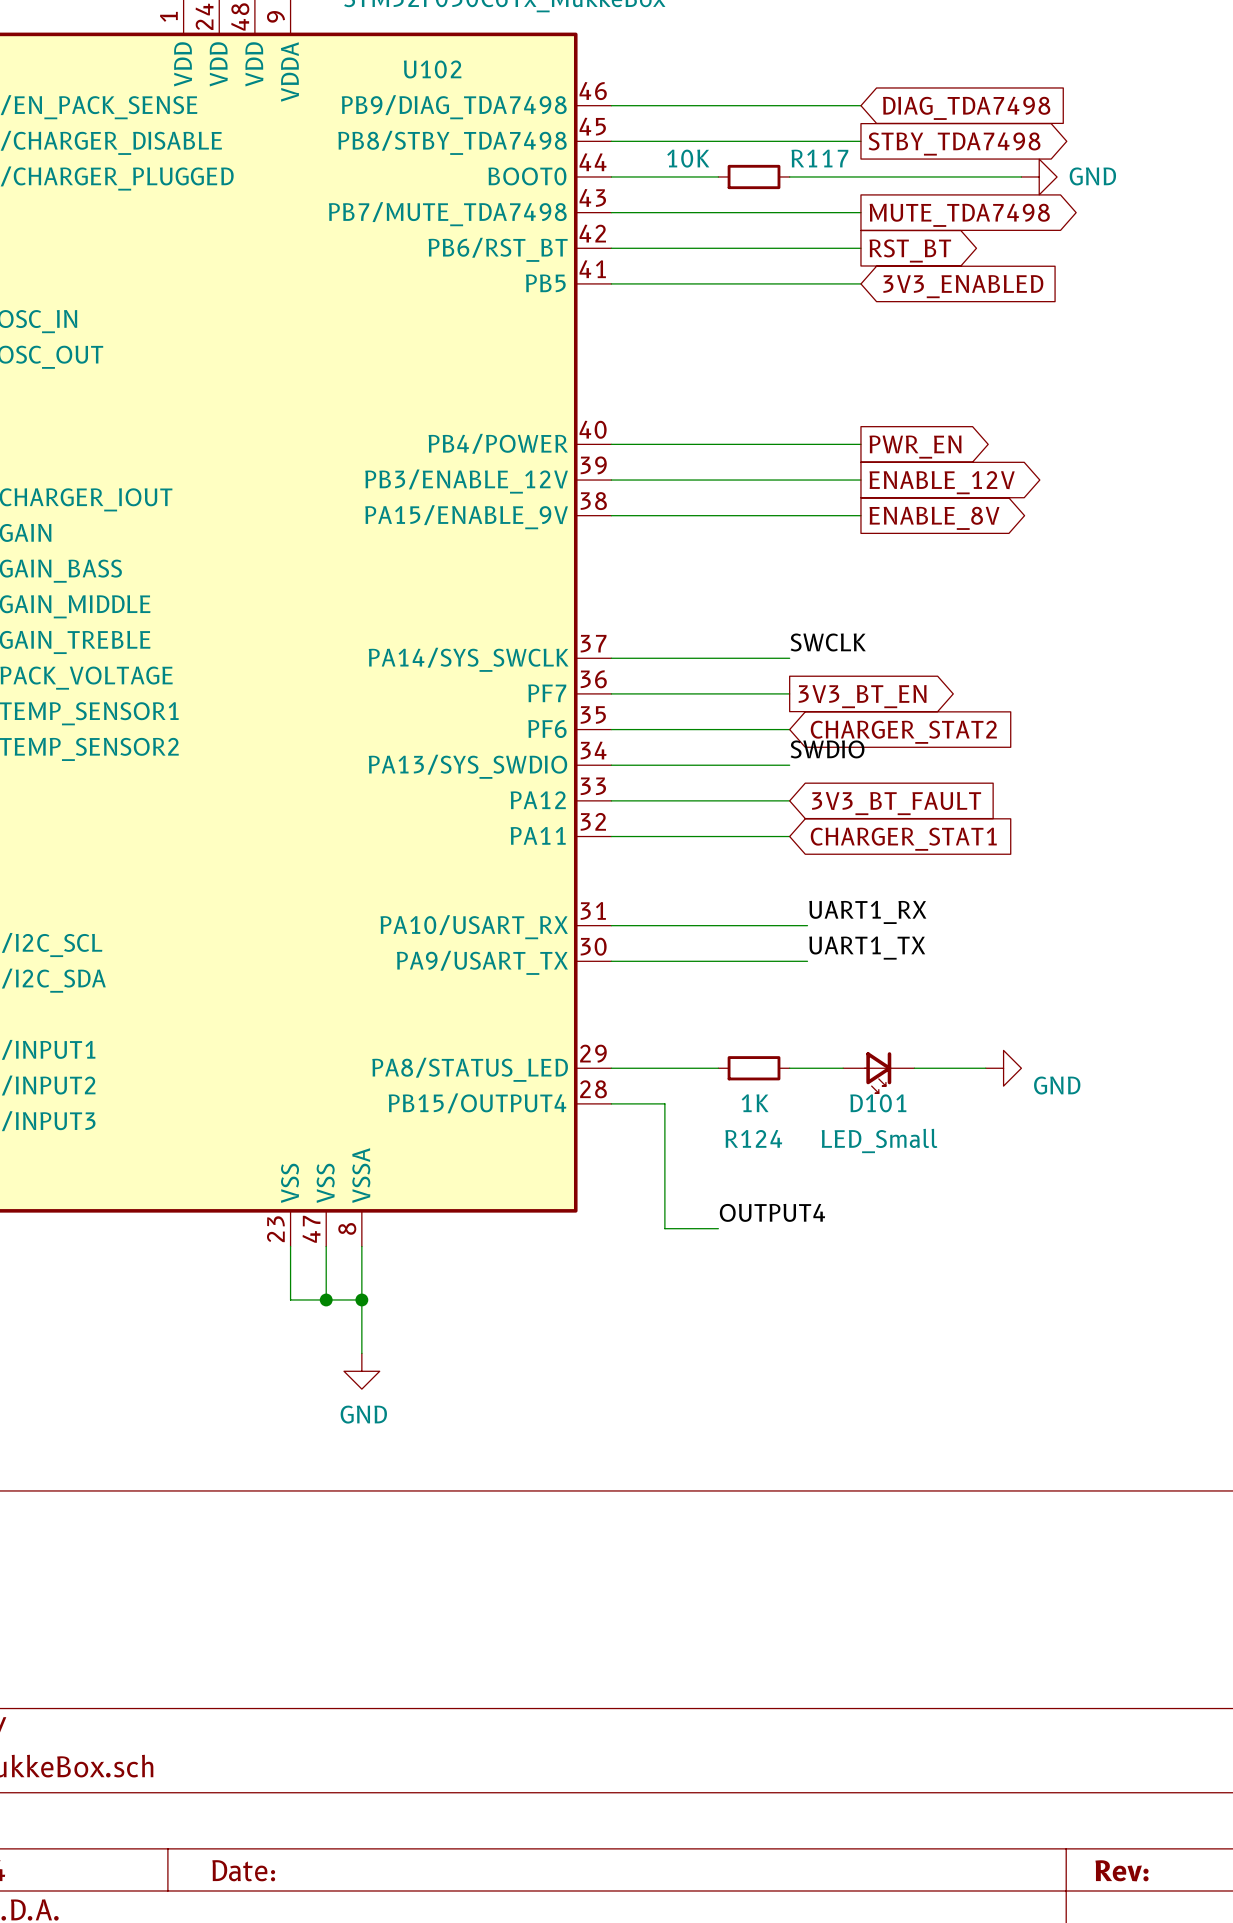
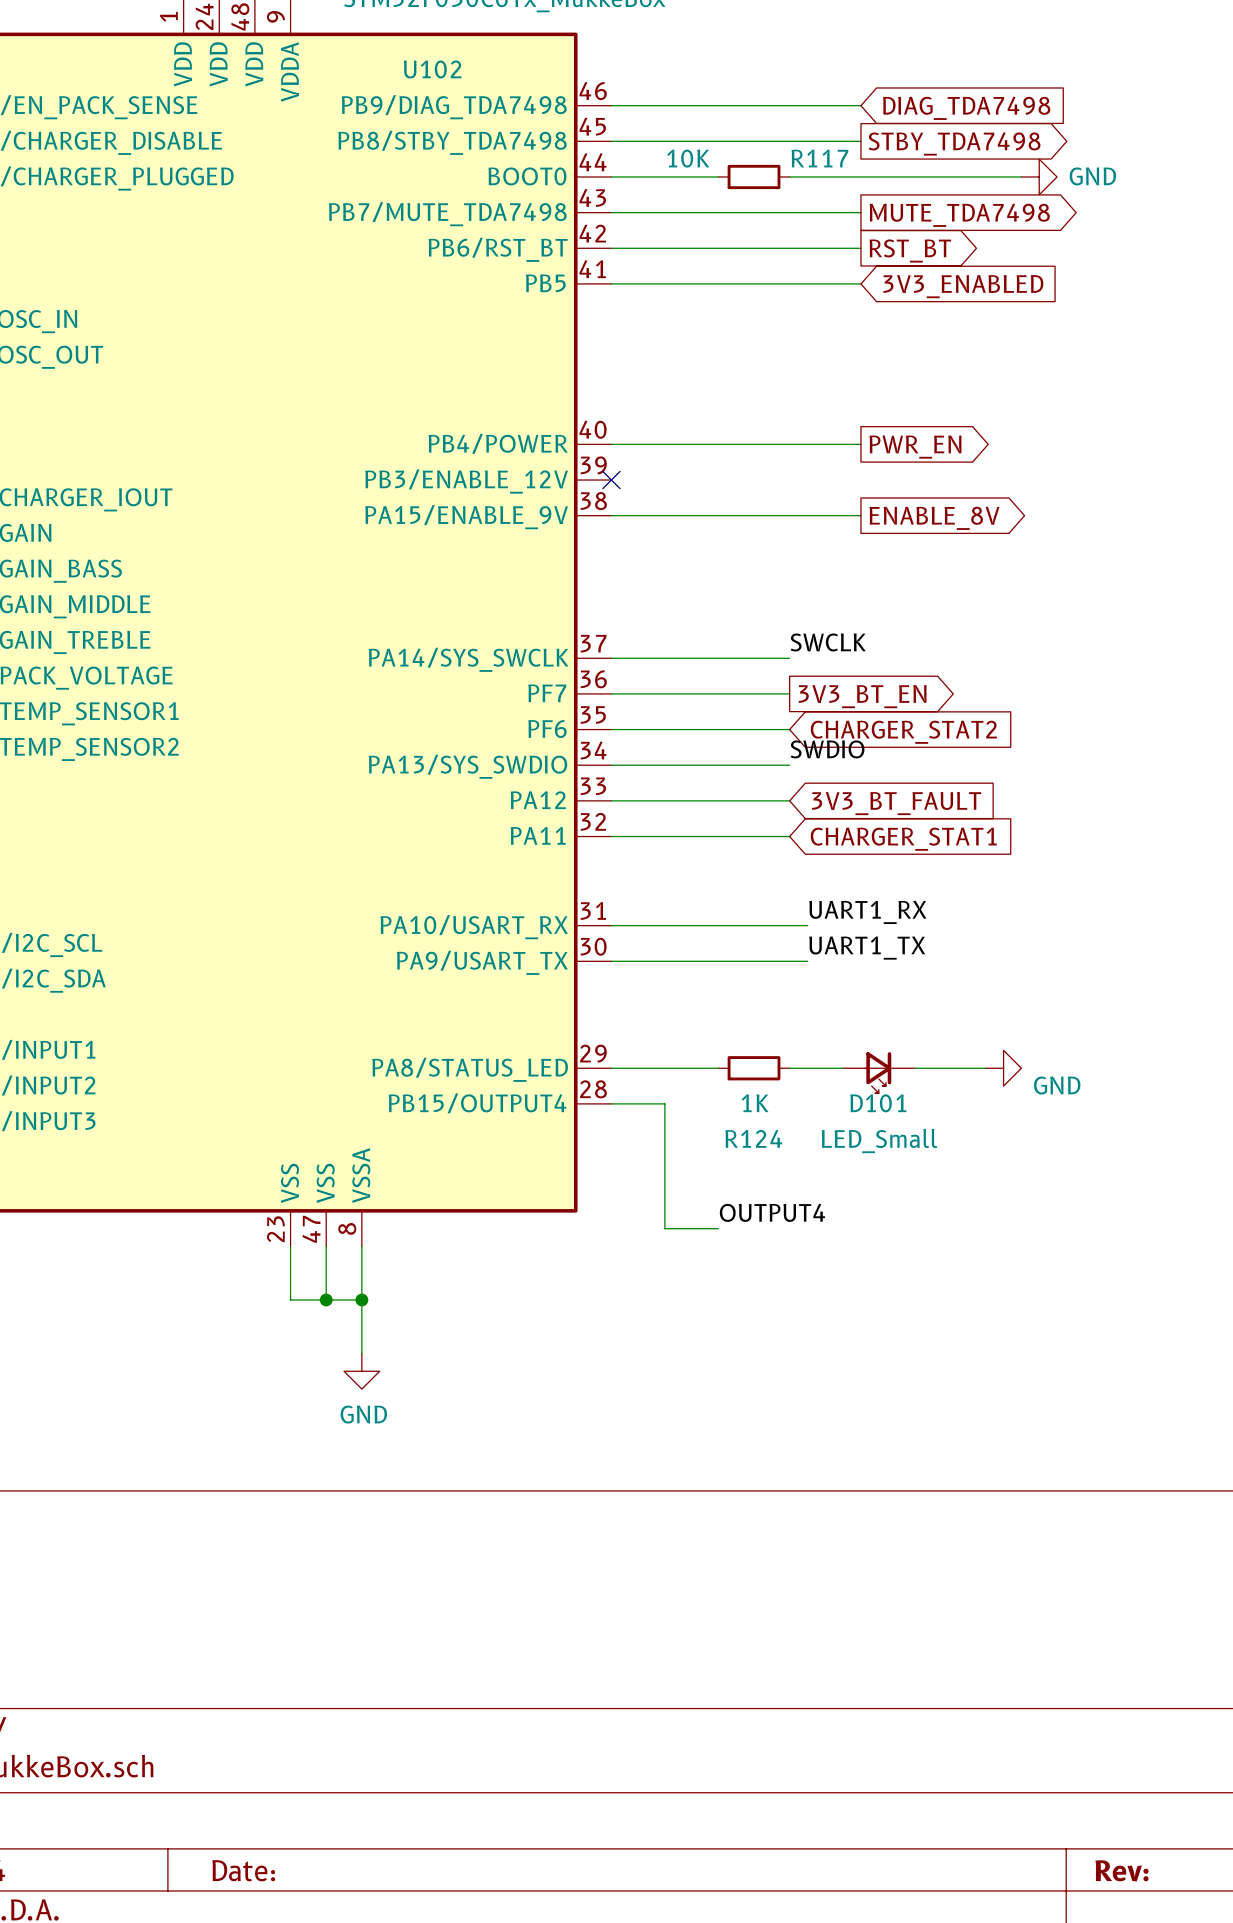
wire: (611, 480) (860, 480) -> none
no-connect mark: none -> (611, 480)
global label: ENABLE_12V (942, 482) -> none

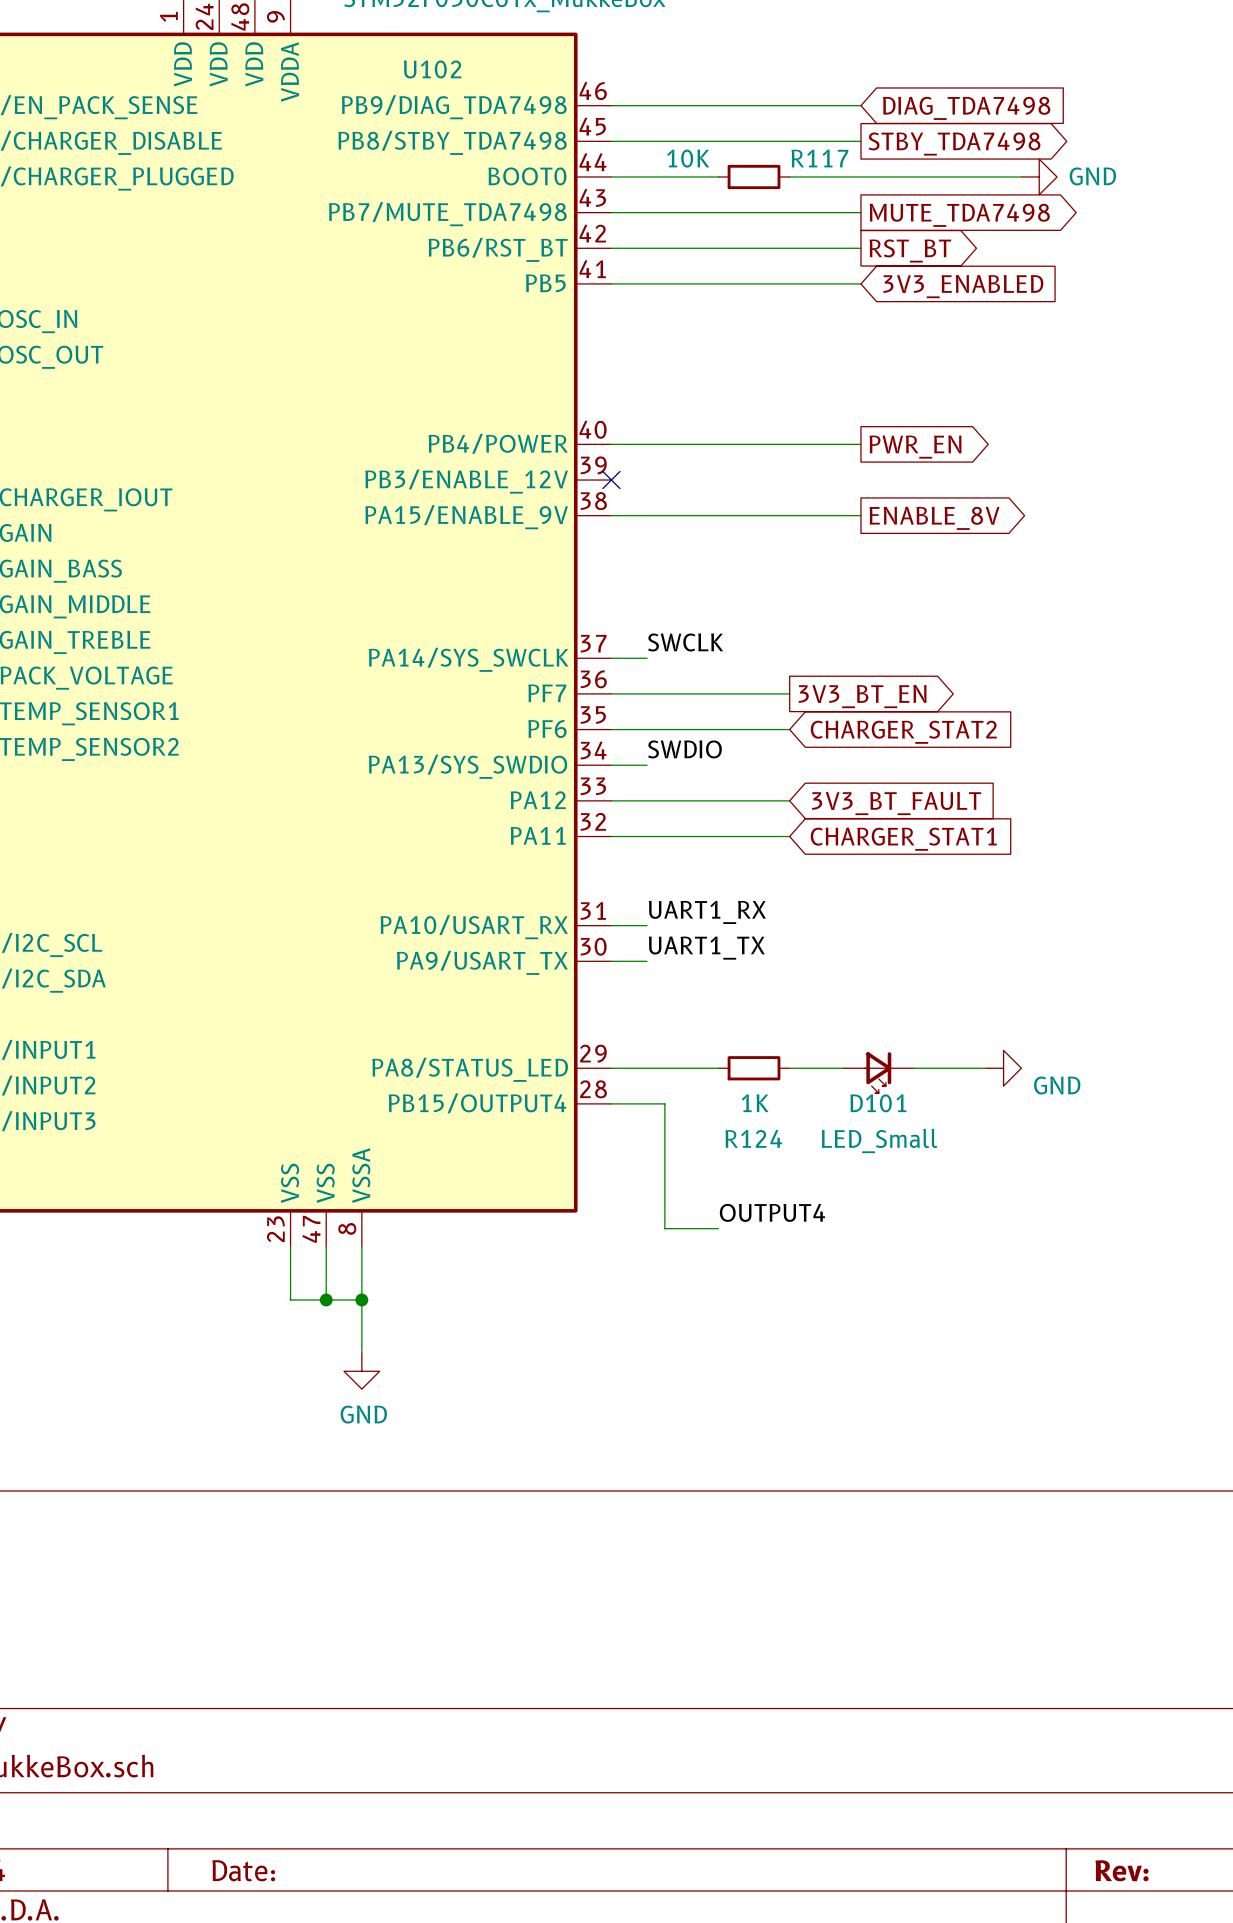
label position: SWCLK (828, 642) -> SWCLK (685, 642)
wire: (647, 658) (789, 658) -> none
label position: SWDIO (827, 749) -> SWDIO (684, 749)
wire: (647, 765) (789, 765) -> none
label position: UART1_RX (867, 912) -> UART1_RX (707, 912)
wire: (647, 925) (807, 925) -> none
label position: UART1_TX (867, 948) -> UART1_TX (706, 948)
wire: (647, 961) (807, 961) -> none

